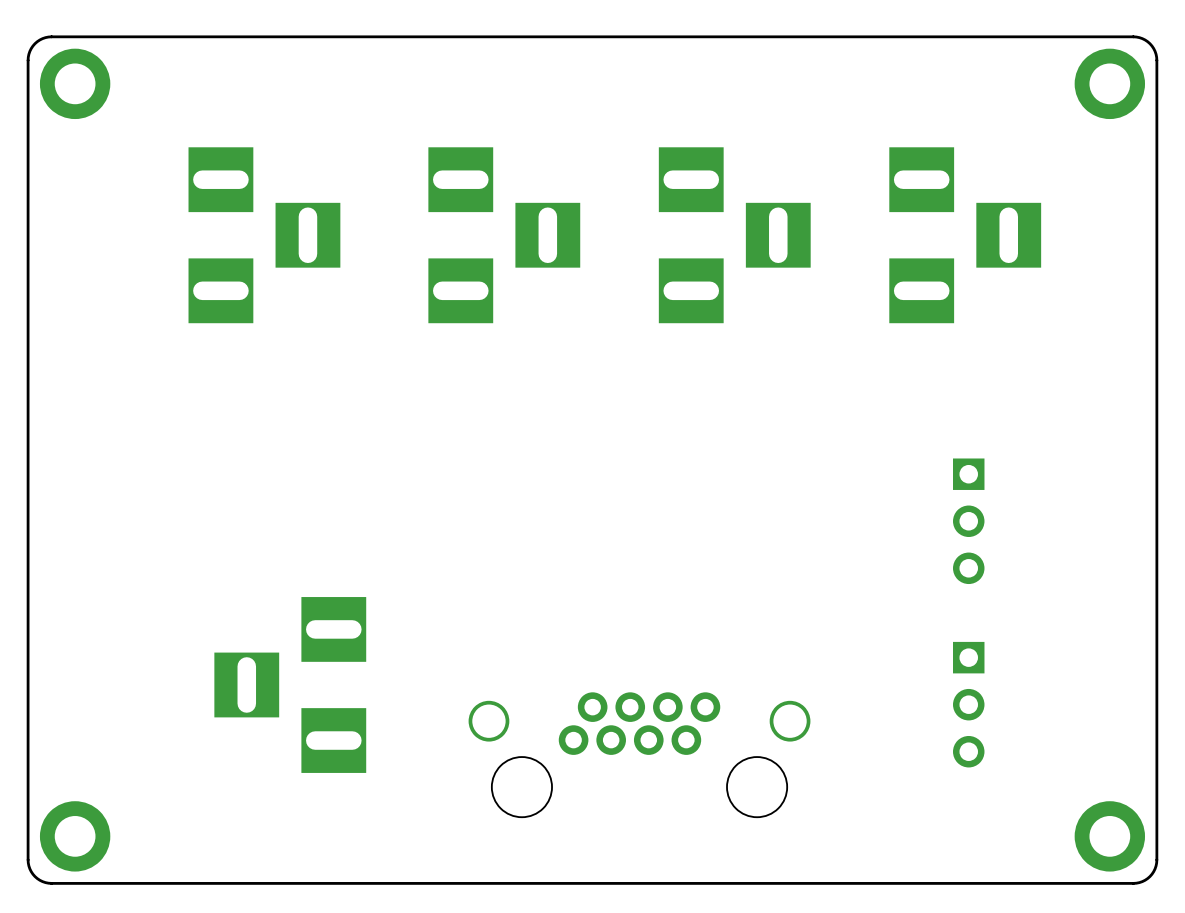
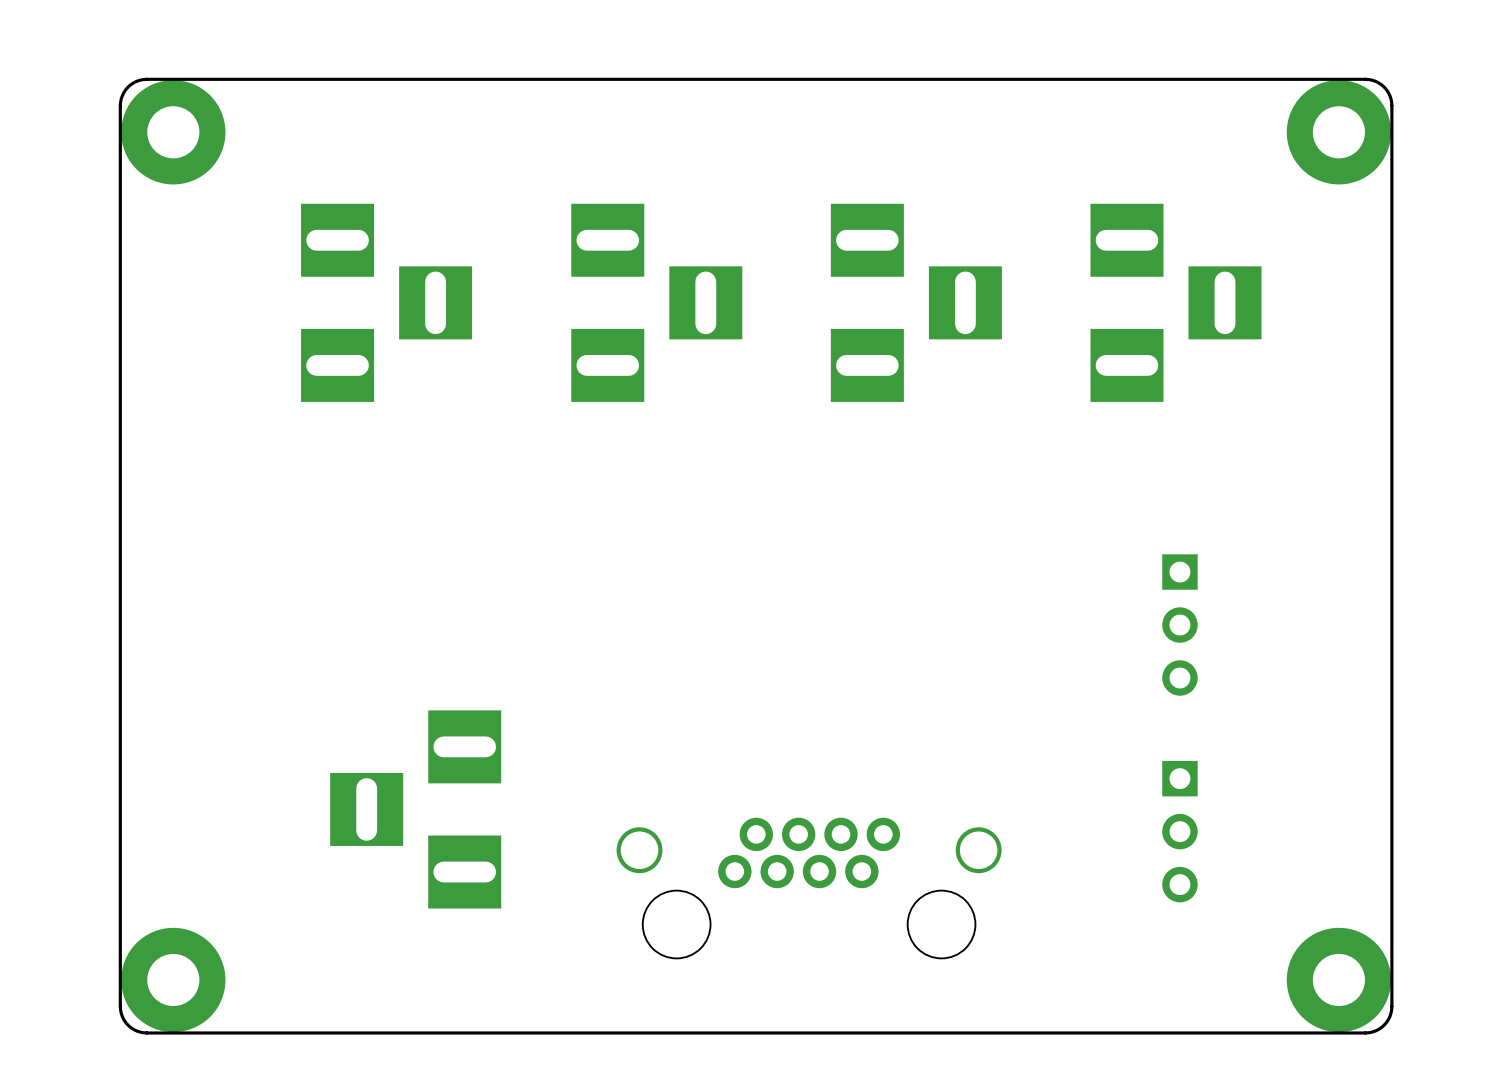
part footprint: [39, 48, 111, 120] -> [121, 80, 226, 185]
part footprint: [1074, 48, 1146, 120] -> [1286, 80, 1392, 185]
part footprint: [39, 801, 111, 872] -> [121, 927, 226, 1033]
part footprint: [1074, 801, 1146, 872] -> [1286, 927, 1392, 1033]

